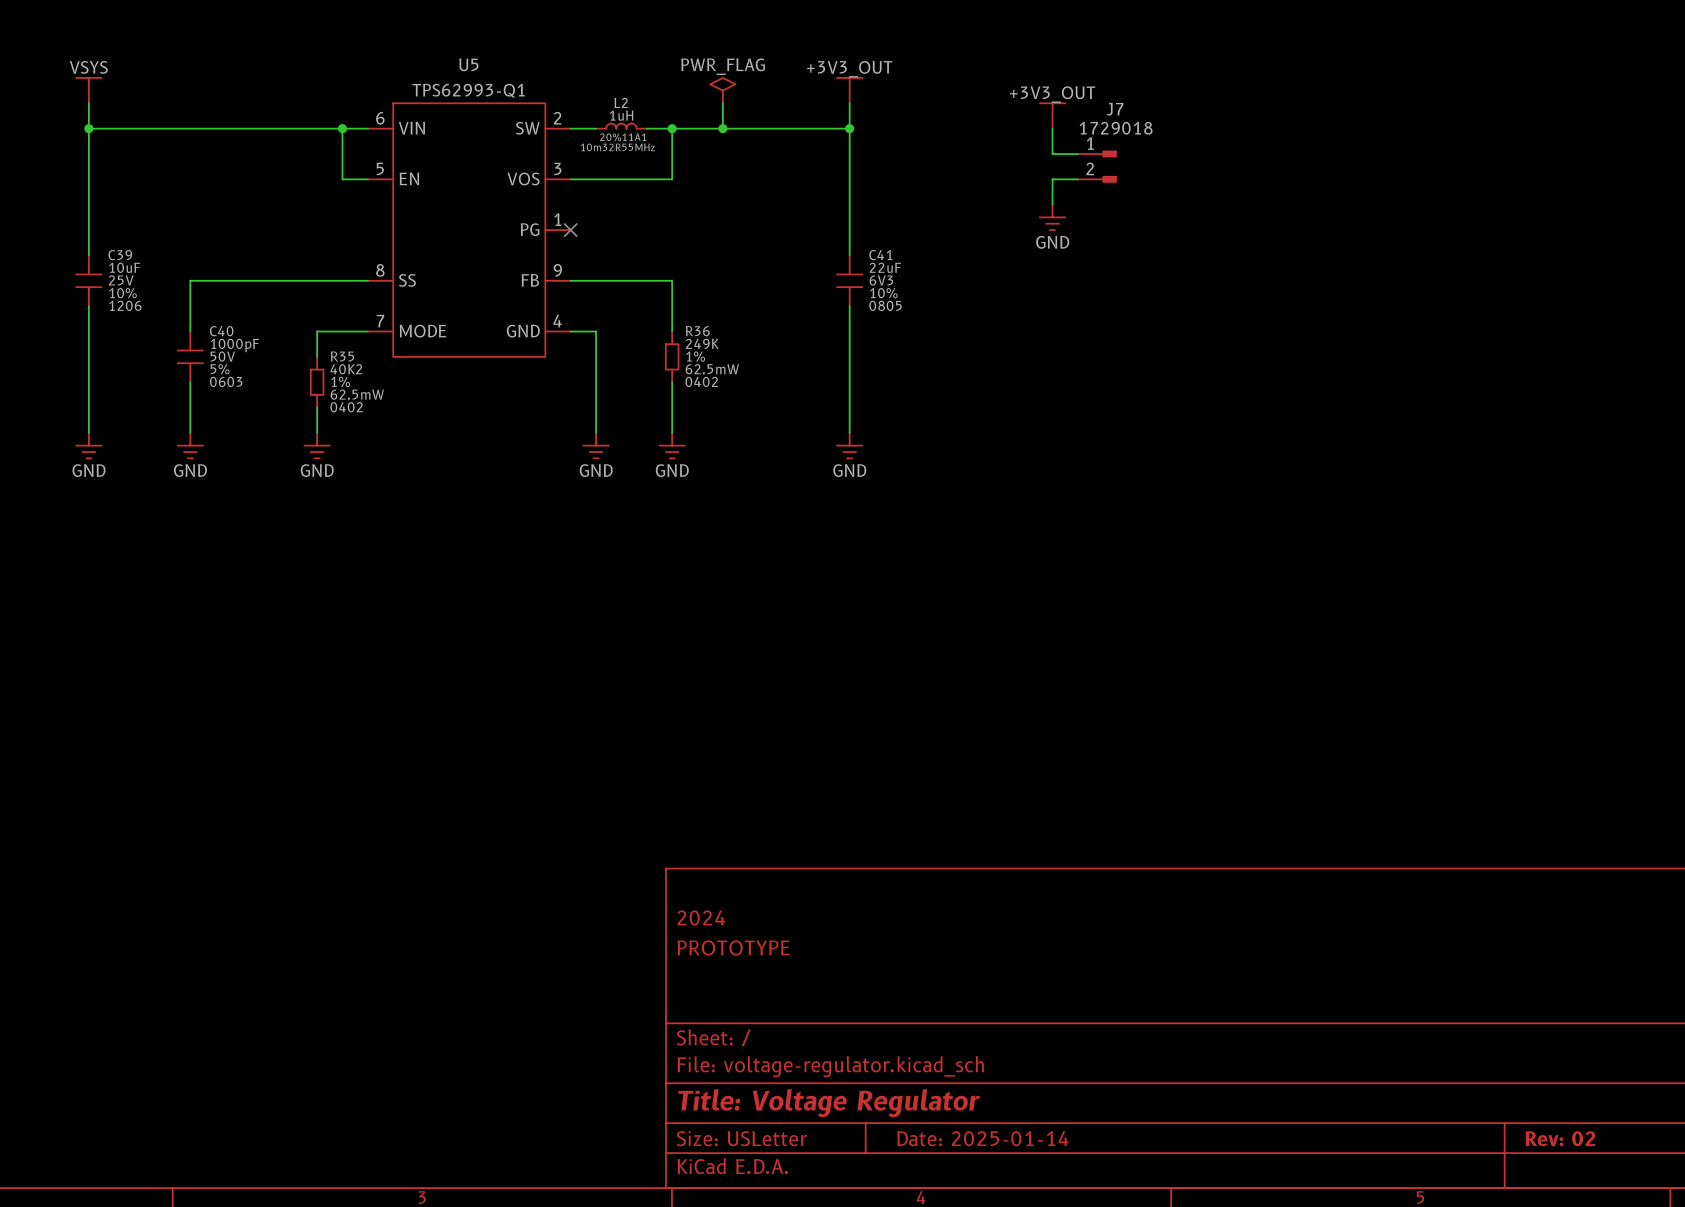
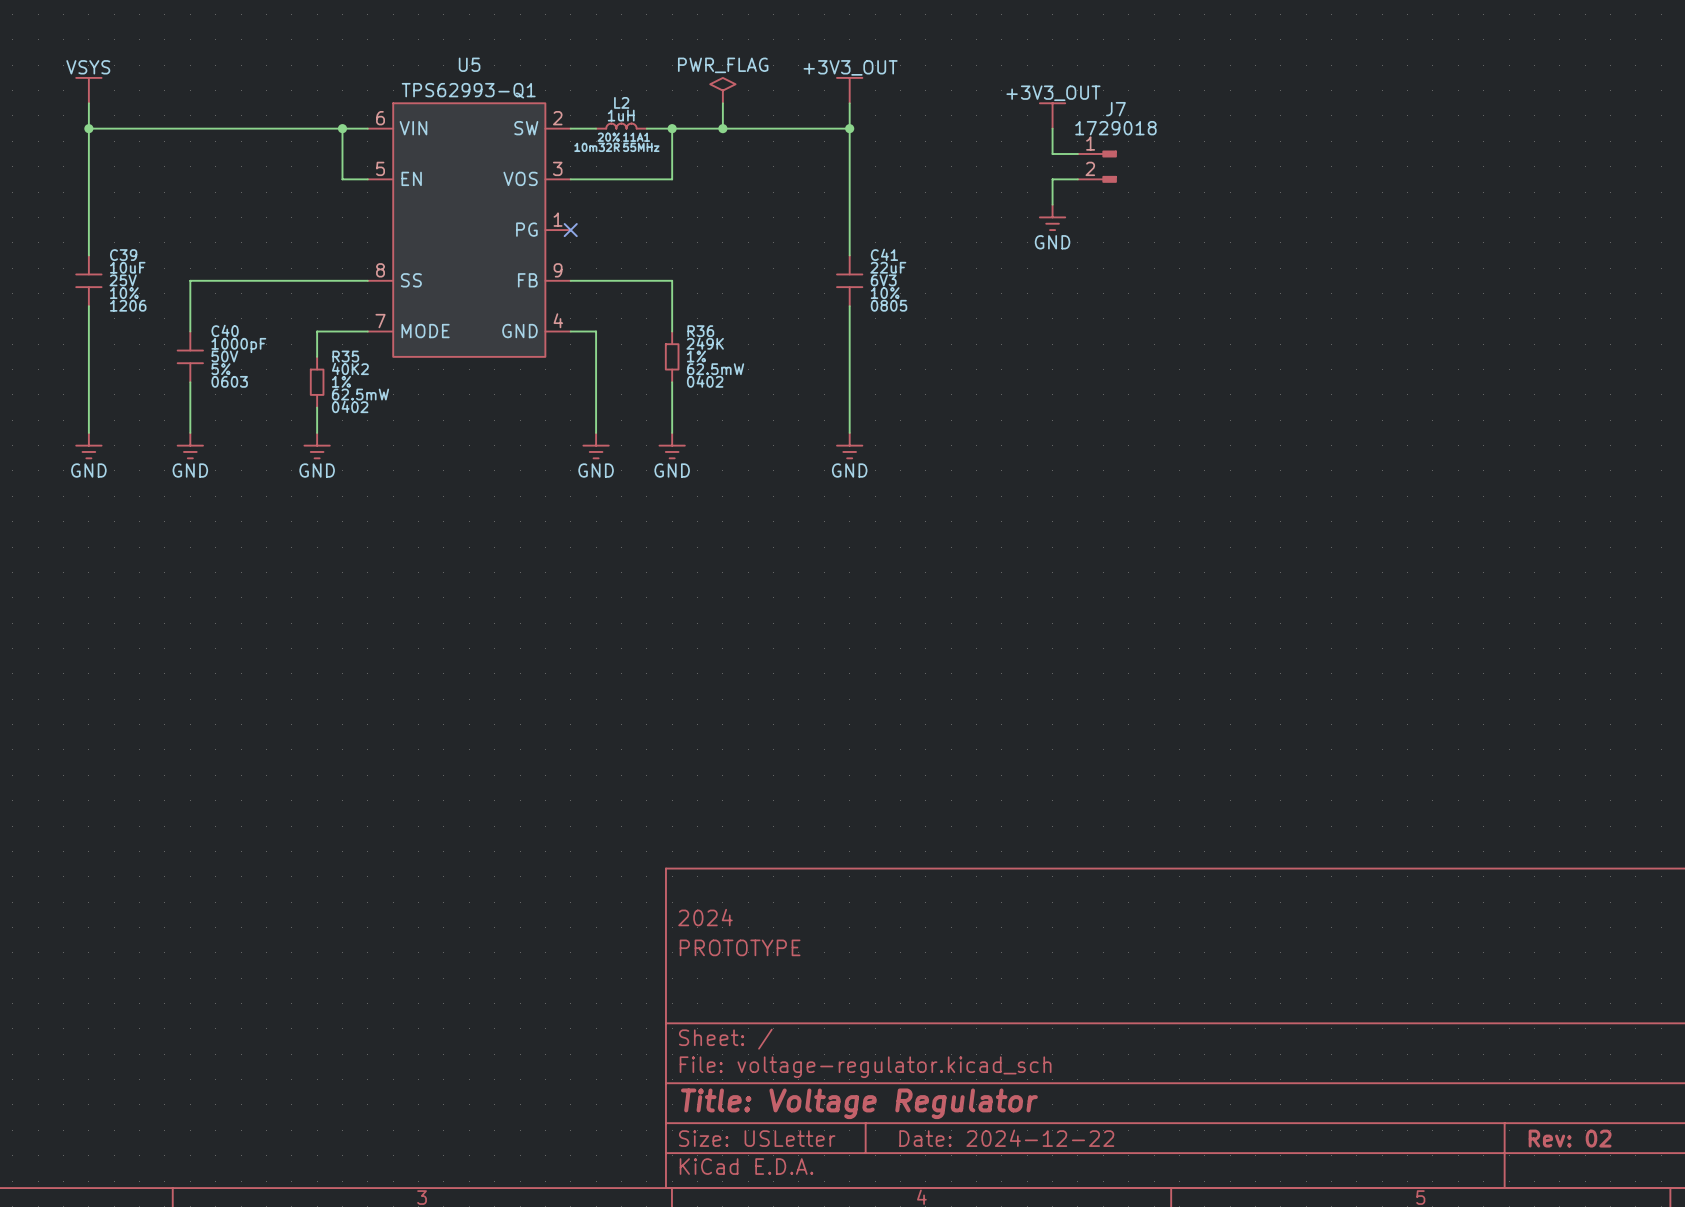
title block: Date: 2025-01-14 (982, 1138) -> Date: 2024-12-22 (1006, 1138)

